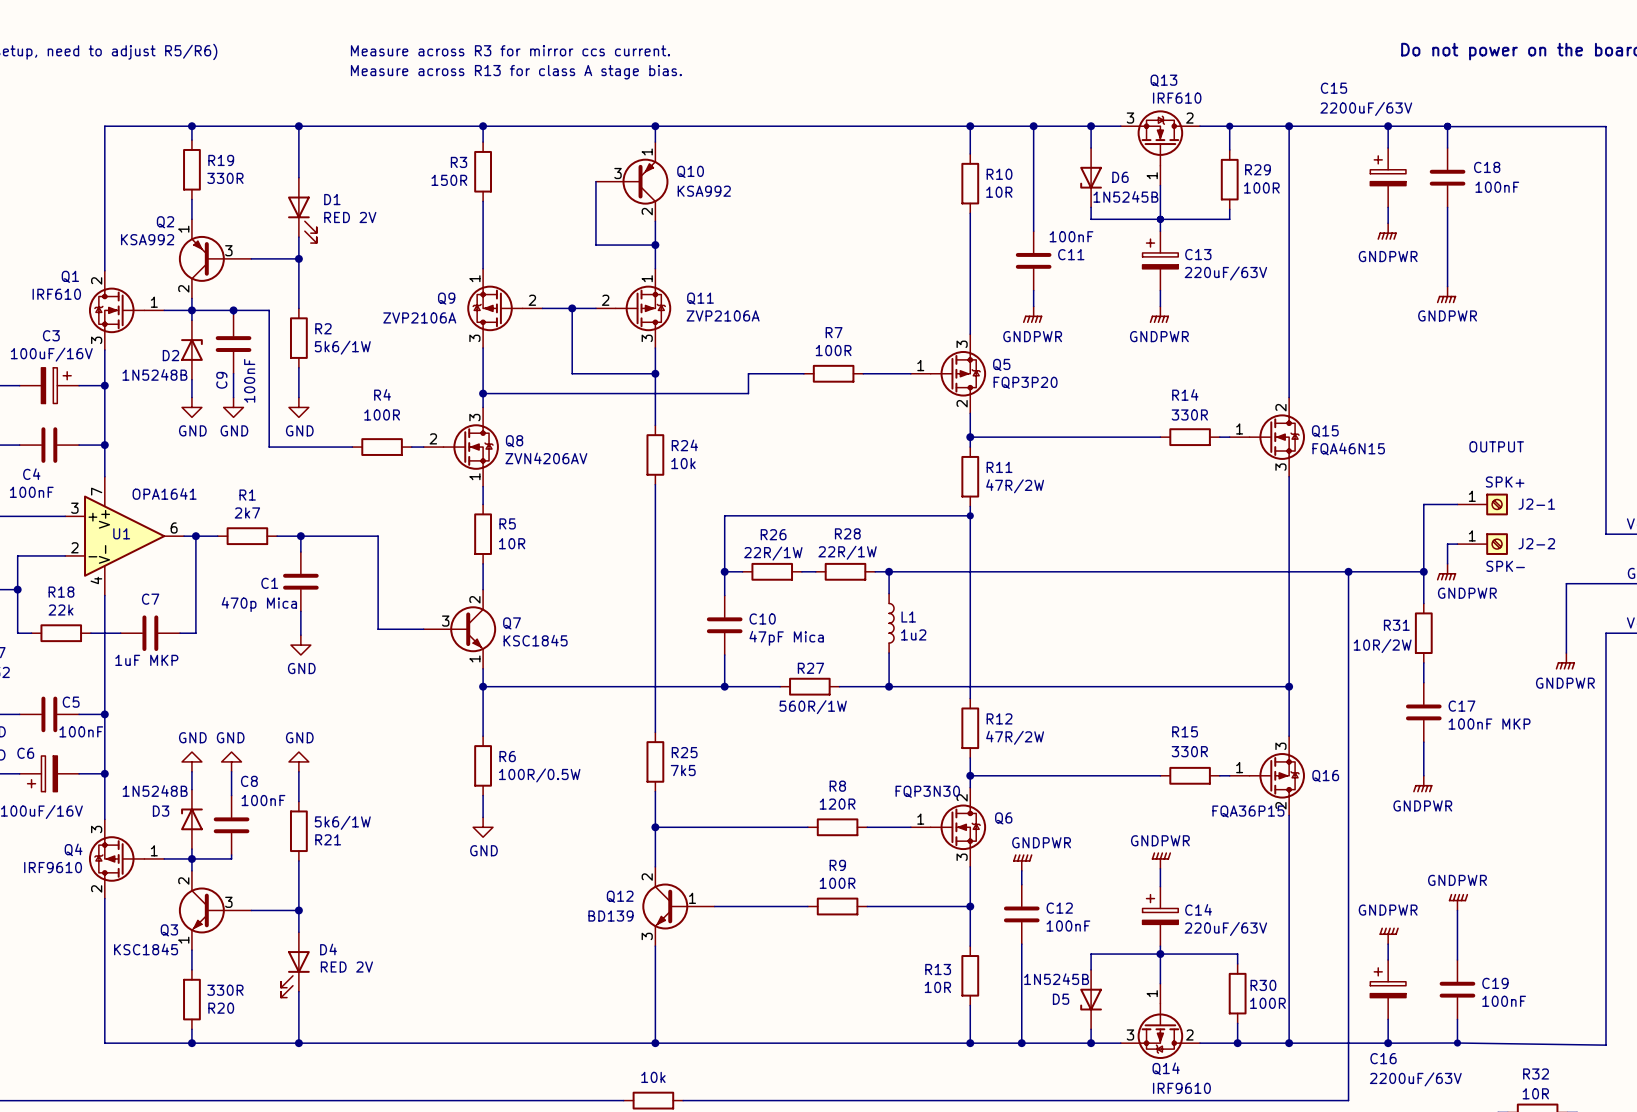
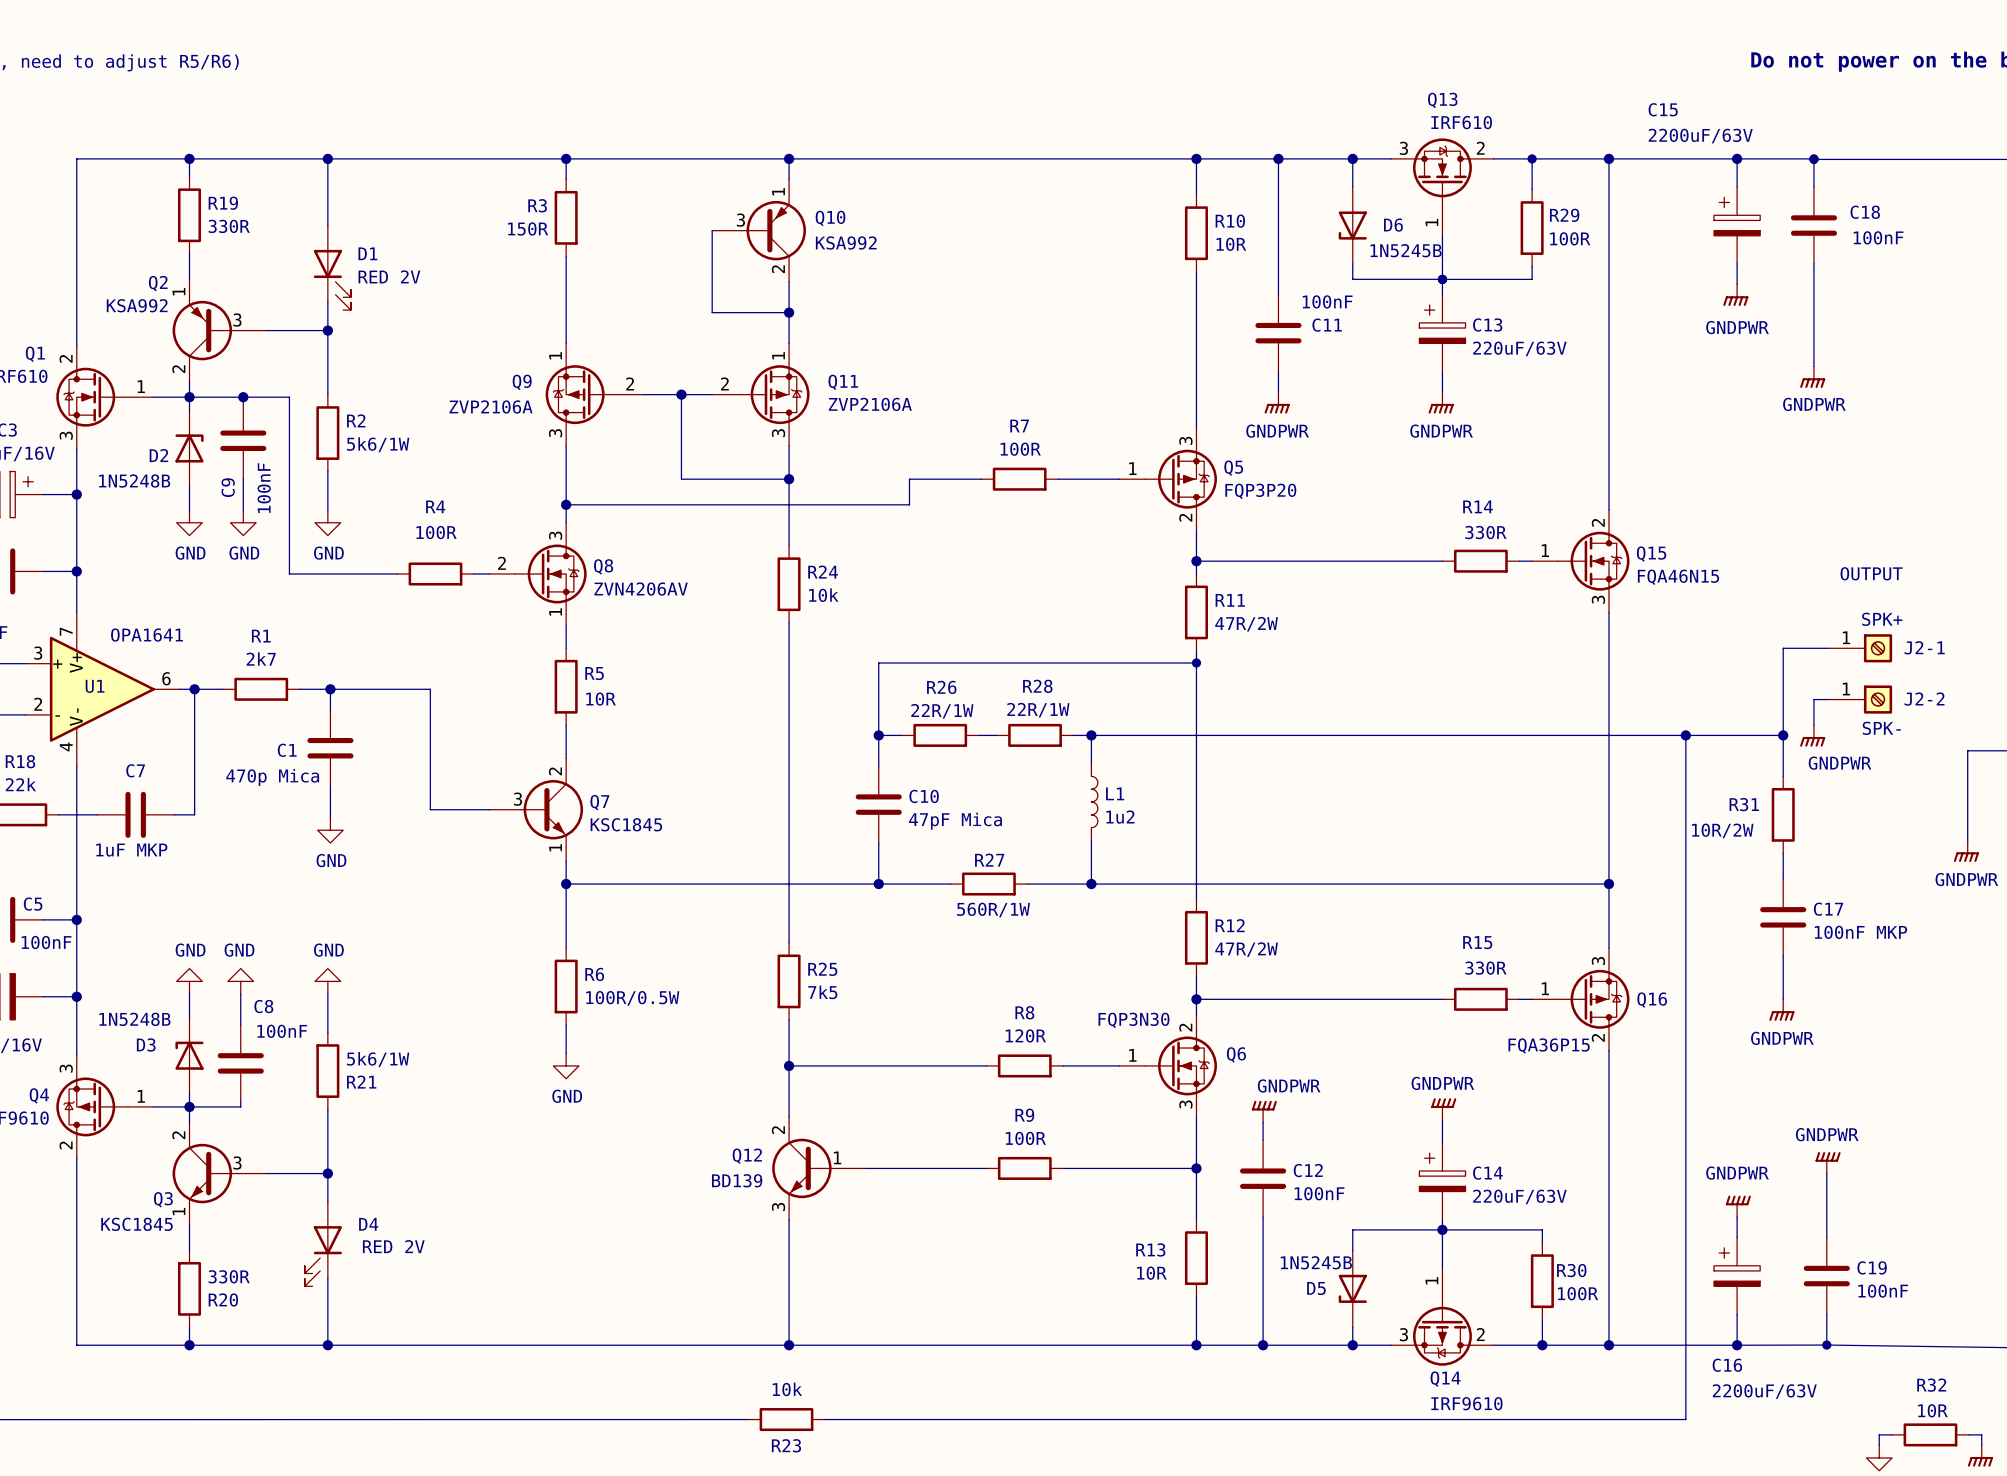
text: Measure across R3 for mirror ccs current. (510, 50) -> none
text: Measure across R13 for class A stage bias. (516, 72) -> none

